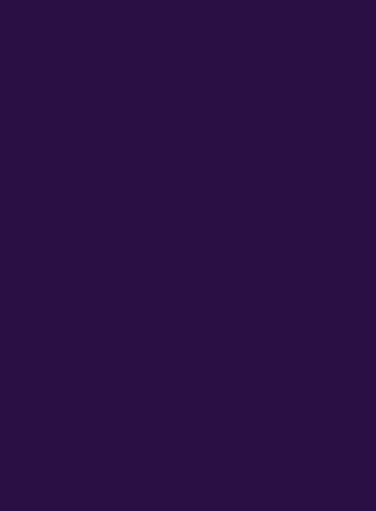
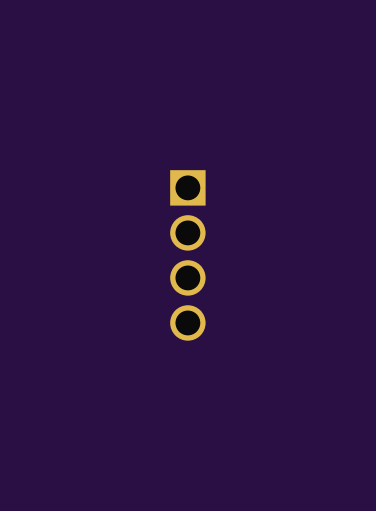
part: none -> (187, 255)

